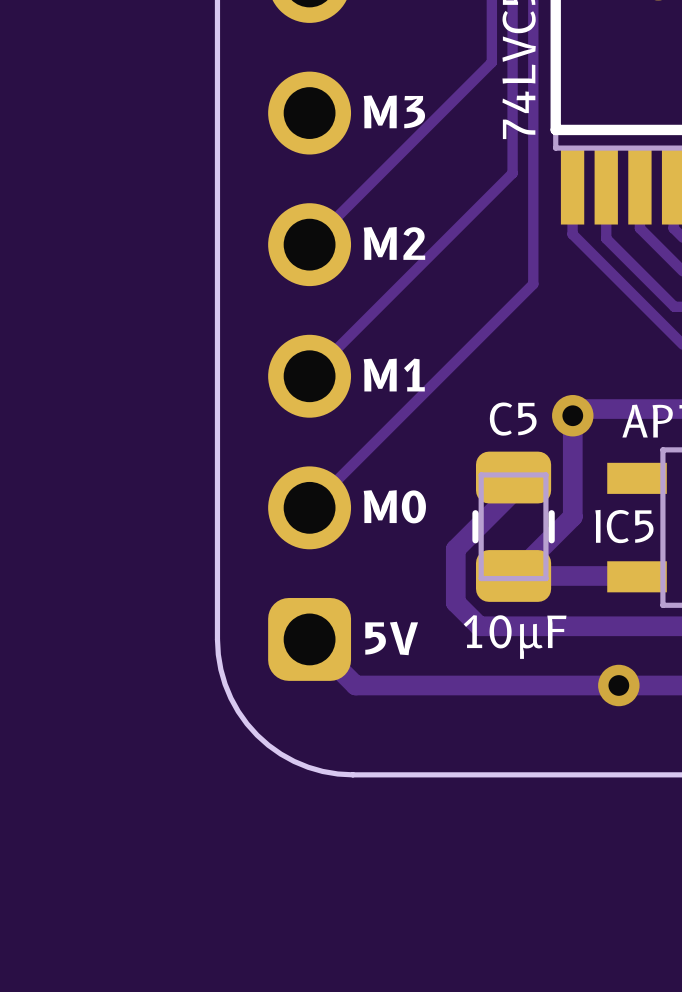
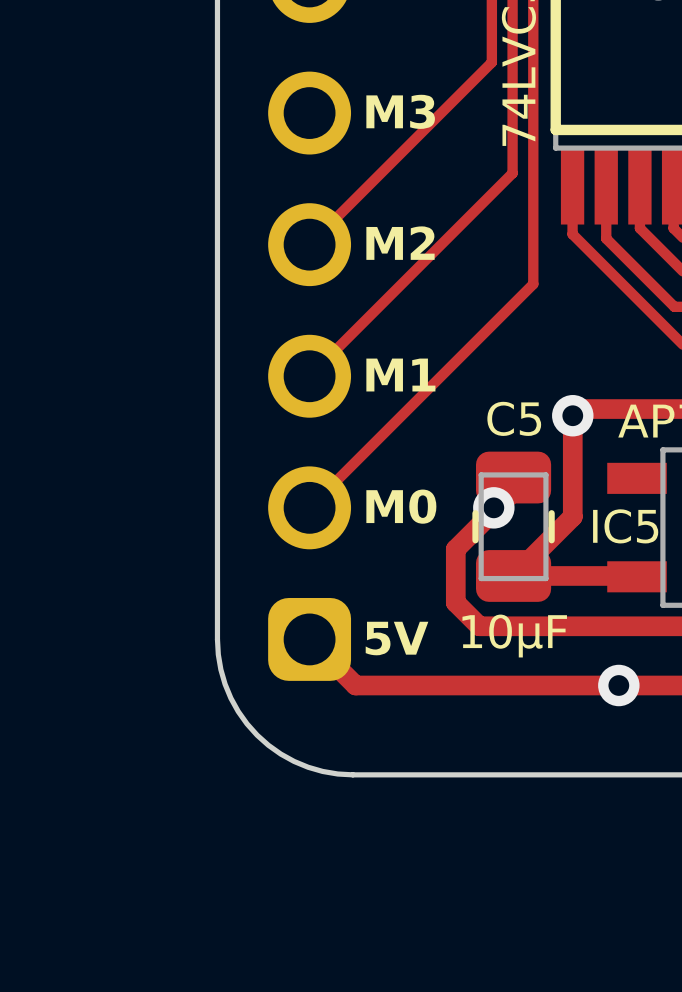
via: none -> (493, 507)

